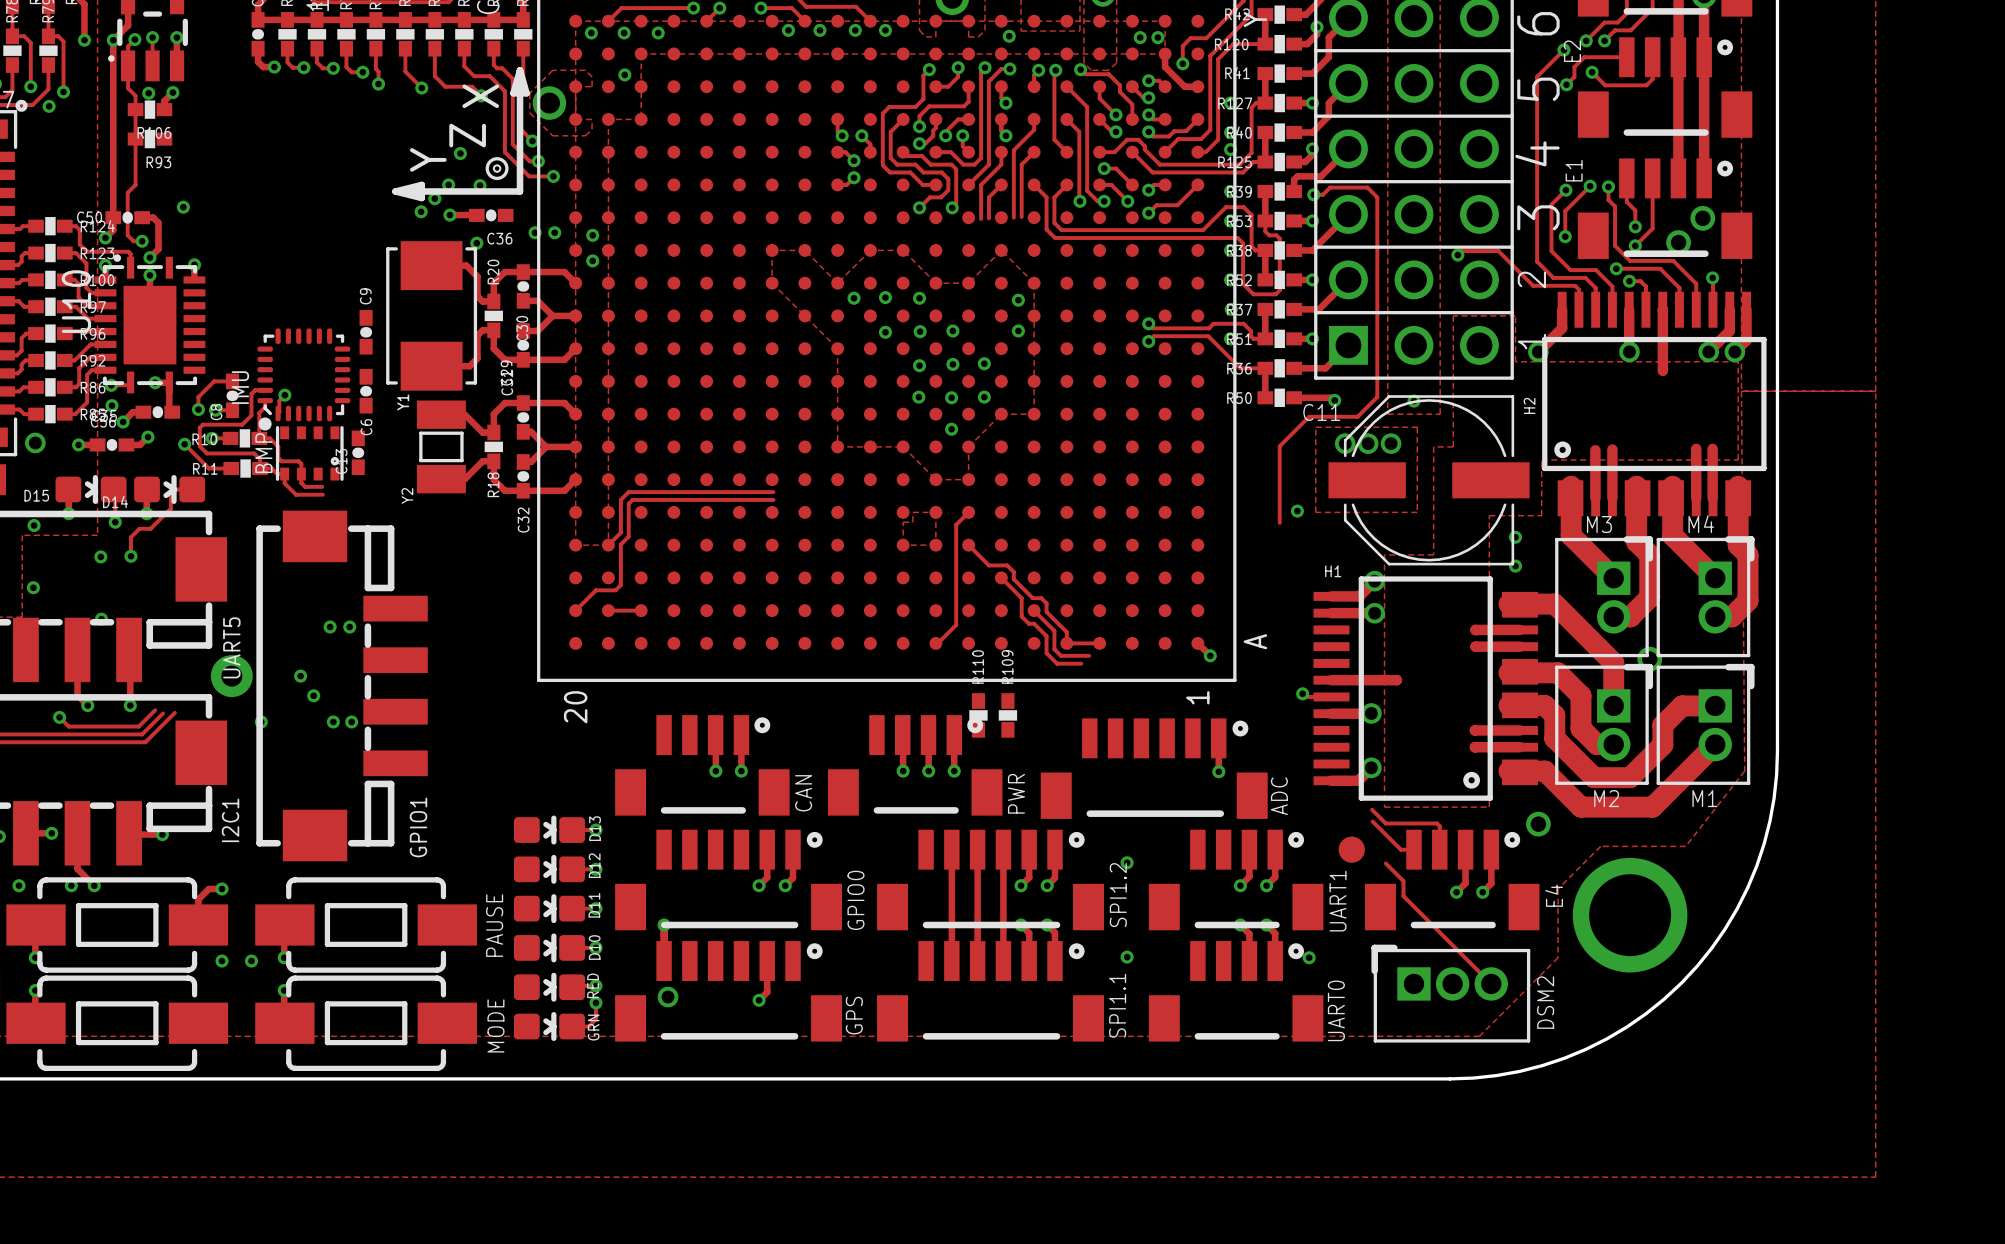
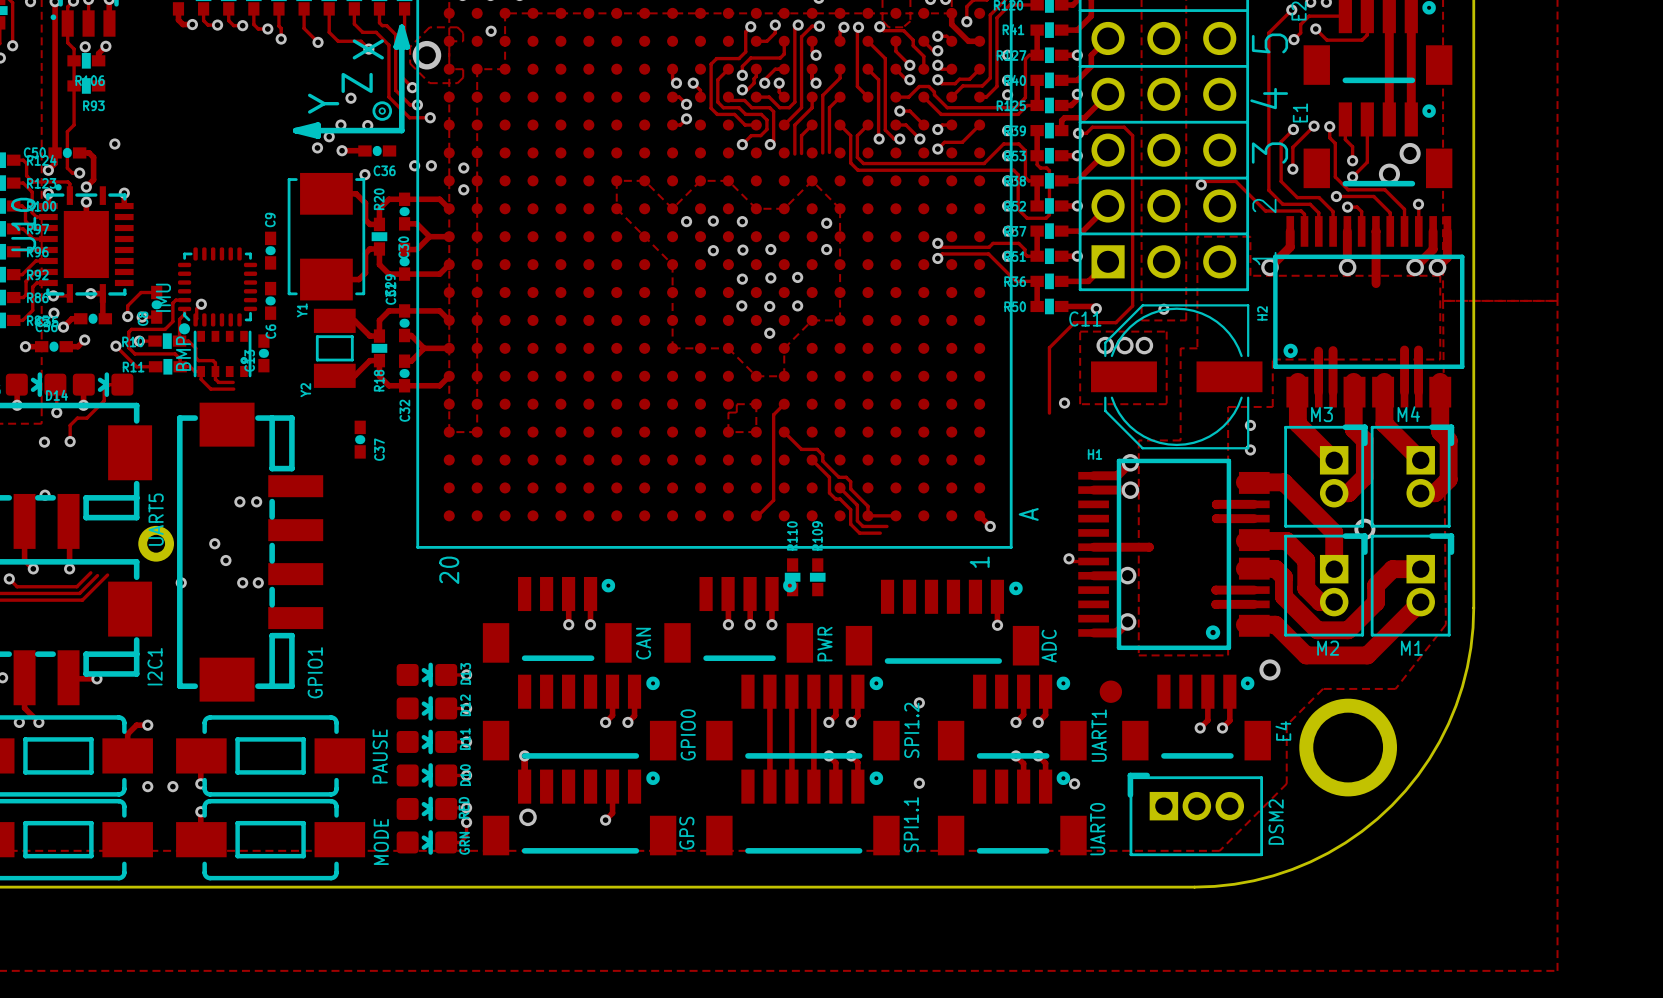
track: (773, 492) (628, 492) (620, 499) (620, 532) (608, 545) -> none
track: (773, 499) (632, 499) (628, 503) (628, 536) (620, 544) (620, 585) (615, 590) (595, 590) (575, 610) -> none
C37: none -> (360, 439)
track: (608, 610) (641, 610) -> none
track: (1372, 809) (1385, 823) (1436, 823) (1439, 826) (1439, 849) -> none
track: (1372, 821) (1400, 849) (1413, 849) -> none
track: (1385, 863) (1403, 881) (1403, 896) (1491, 983) -> none

